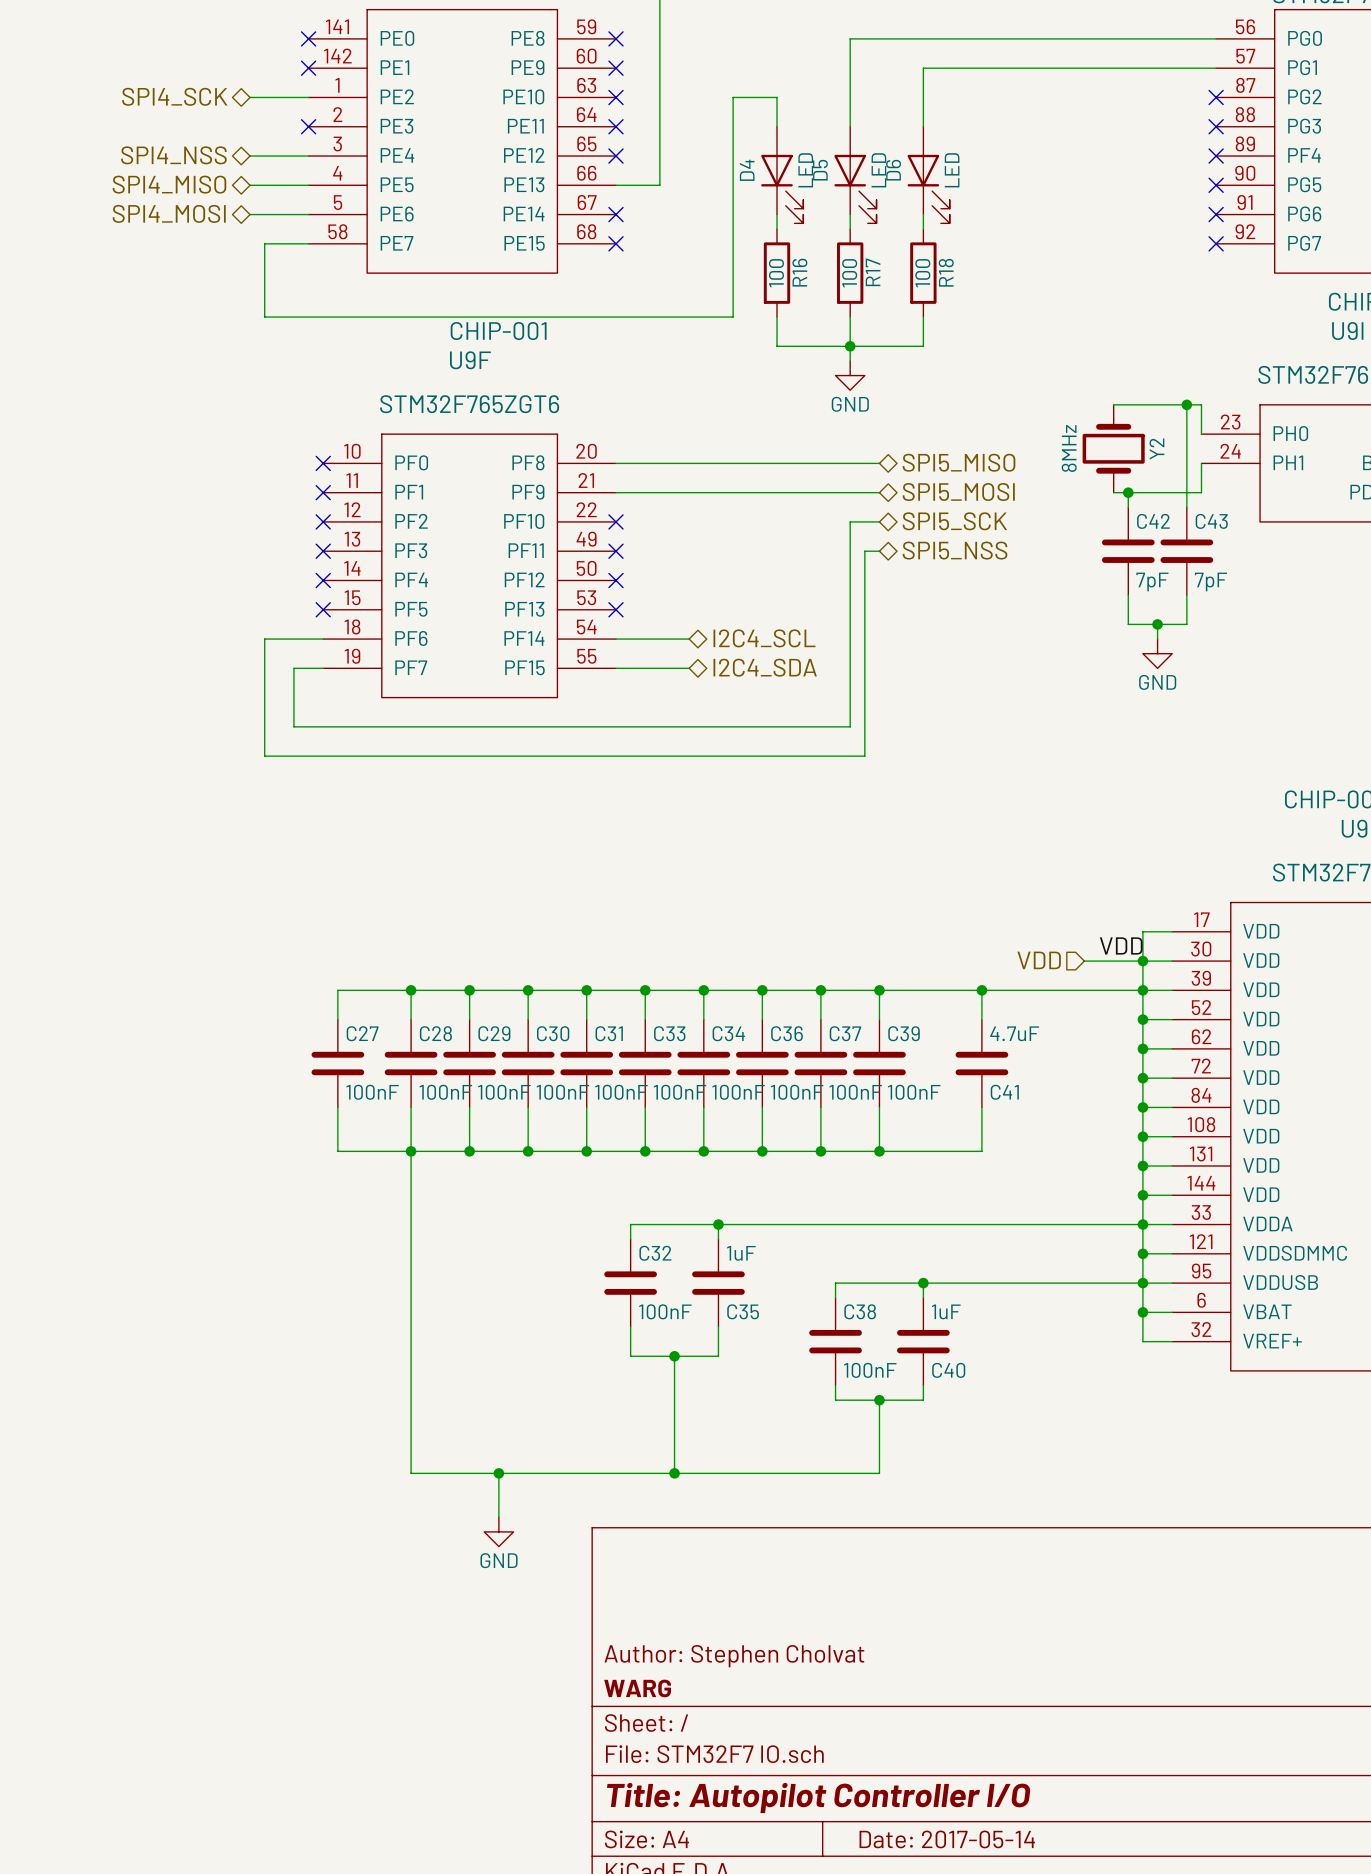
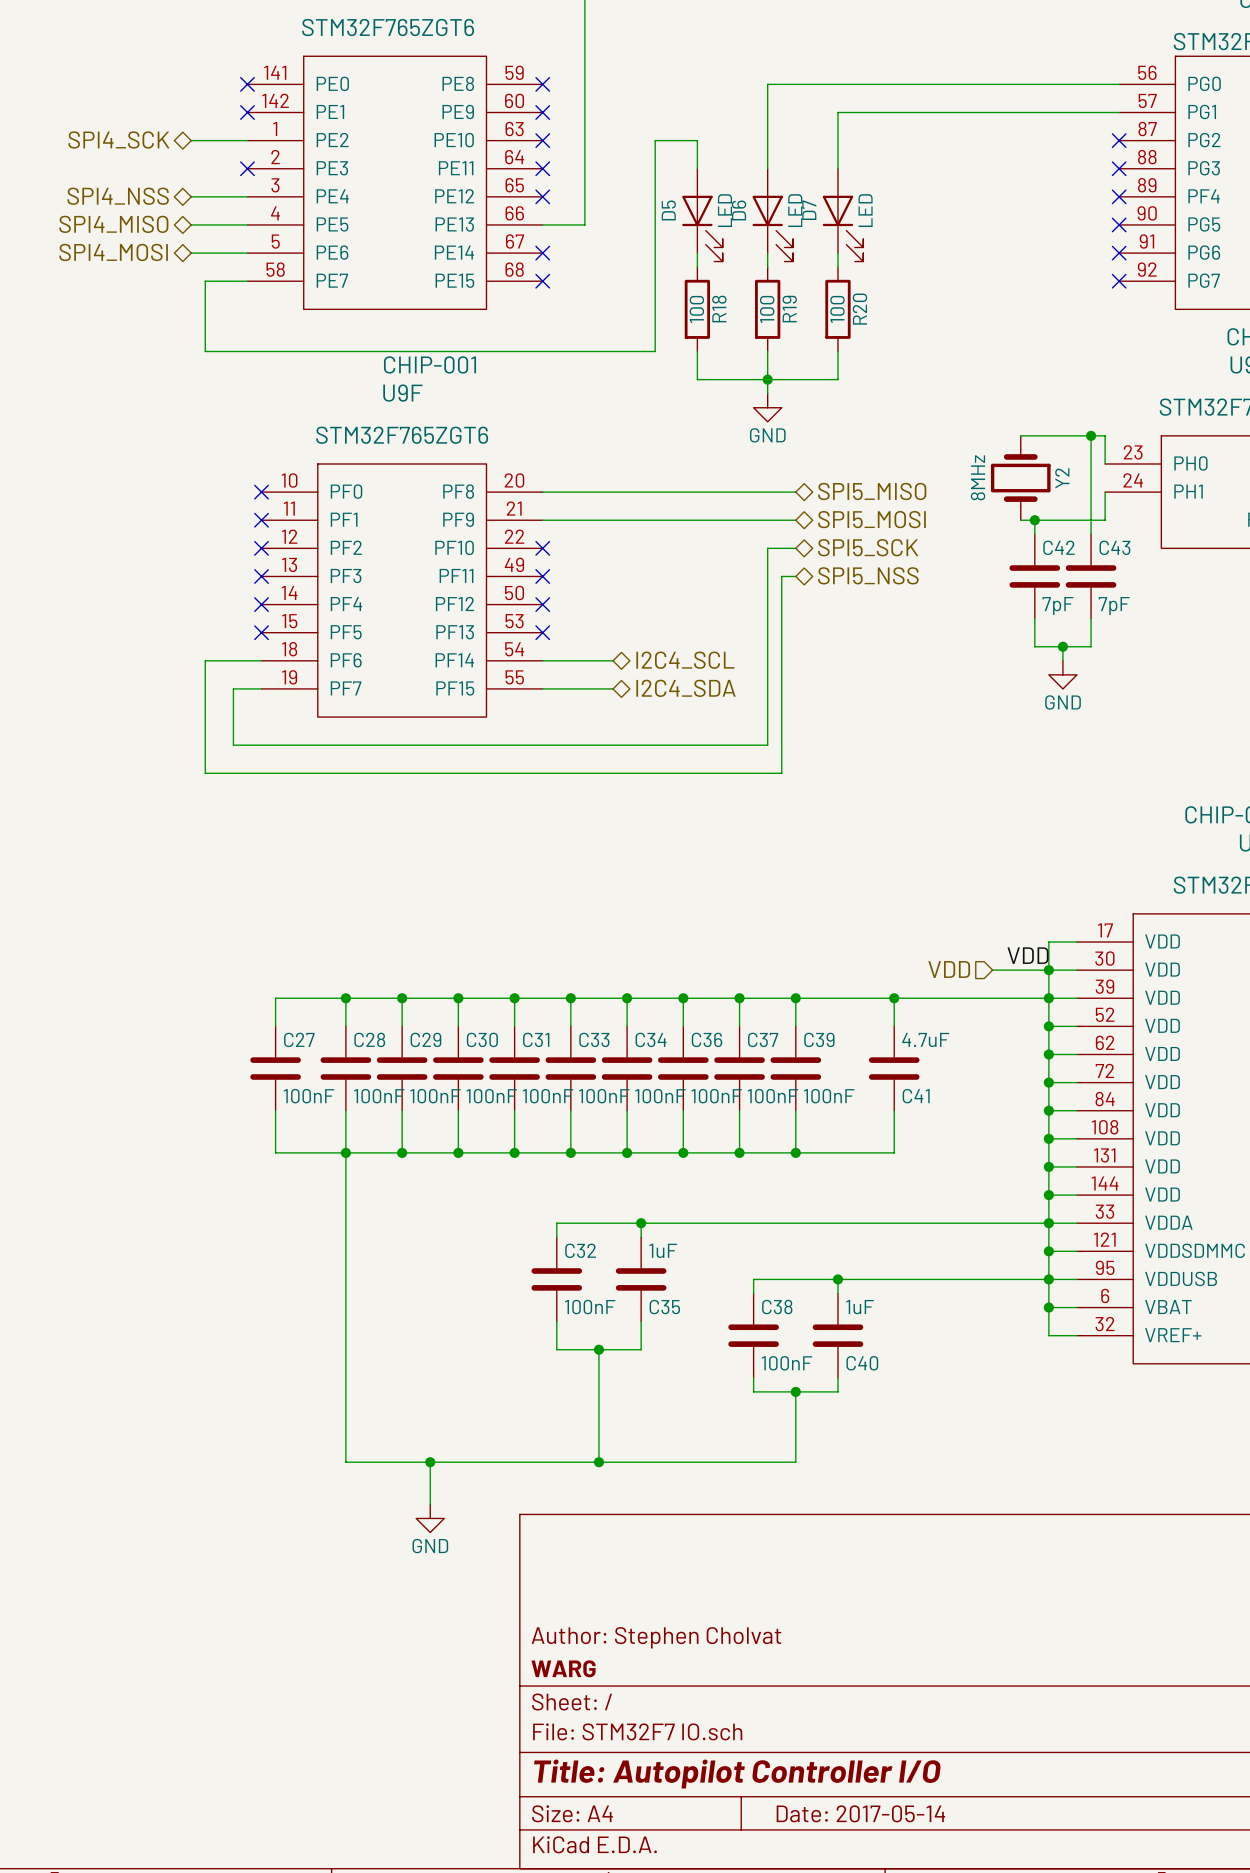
D4 name: D4 (747, 170) -> D5 (668, 210)
D5 name: D5 (820, 170) -> D6 (739, 210)
D6 name: D6 (893, 170) -> D7 (809, 210)
R16 name: R16 (799, 272) -> R18 (719, 309)
R17 name: R17 (873, 272) -> R19 (789, 309)
R18 name: R18 (946, 272) -> R20 (859, 309)

